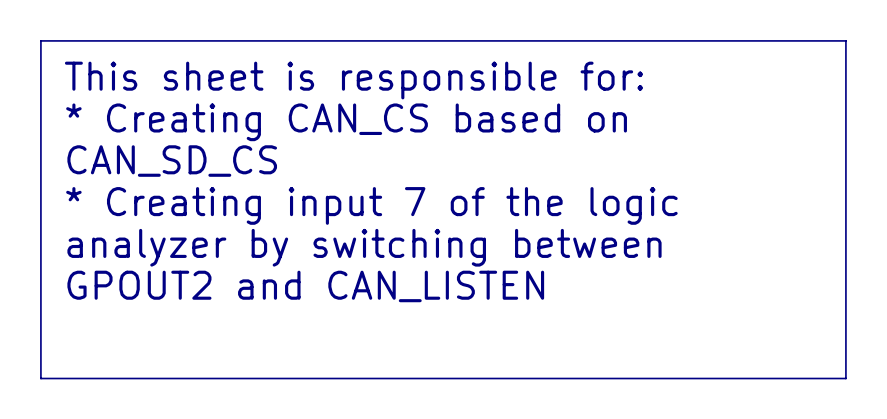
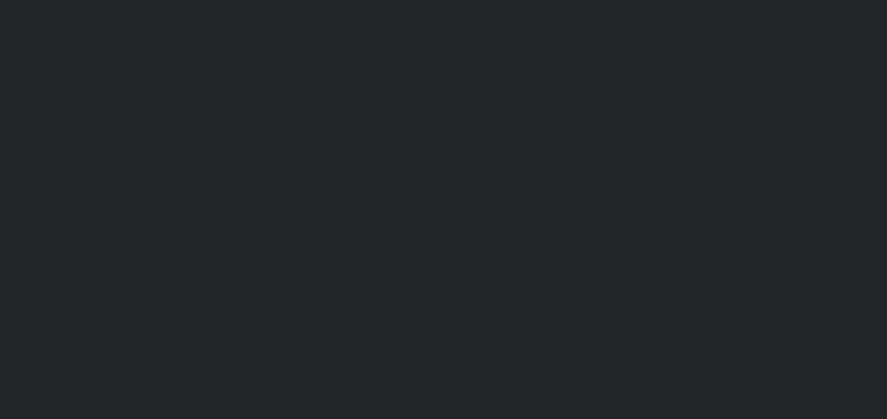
line: (40, 40) (845, 40) (845, 378) (40, 378) (40, 40) -> none
text: This sheet is responsible for: (353, 80) -> none
text: * Creating CAN_CS based on (346, 122) -> none
text: CAN_SD_CS (172, 161) -> none
text: * Creating input 7 of the logic (371, 205) -> none
text: analyzer by switching between (364, 247) -> none
text: GPOUT2 and CAN_LISTEN (305, 286) -> none

